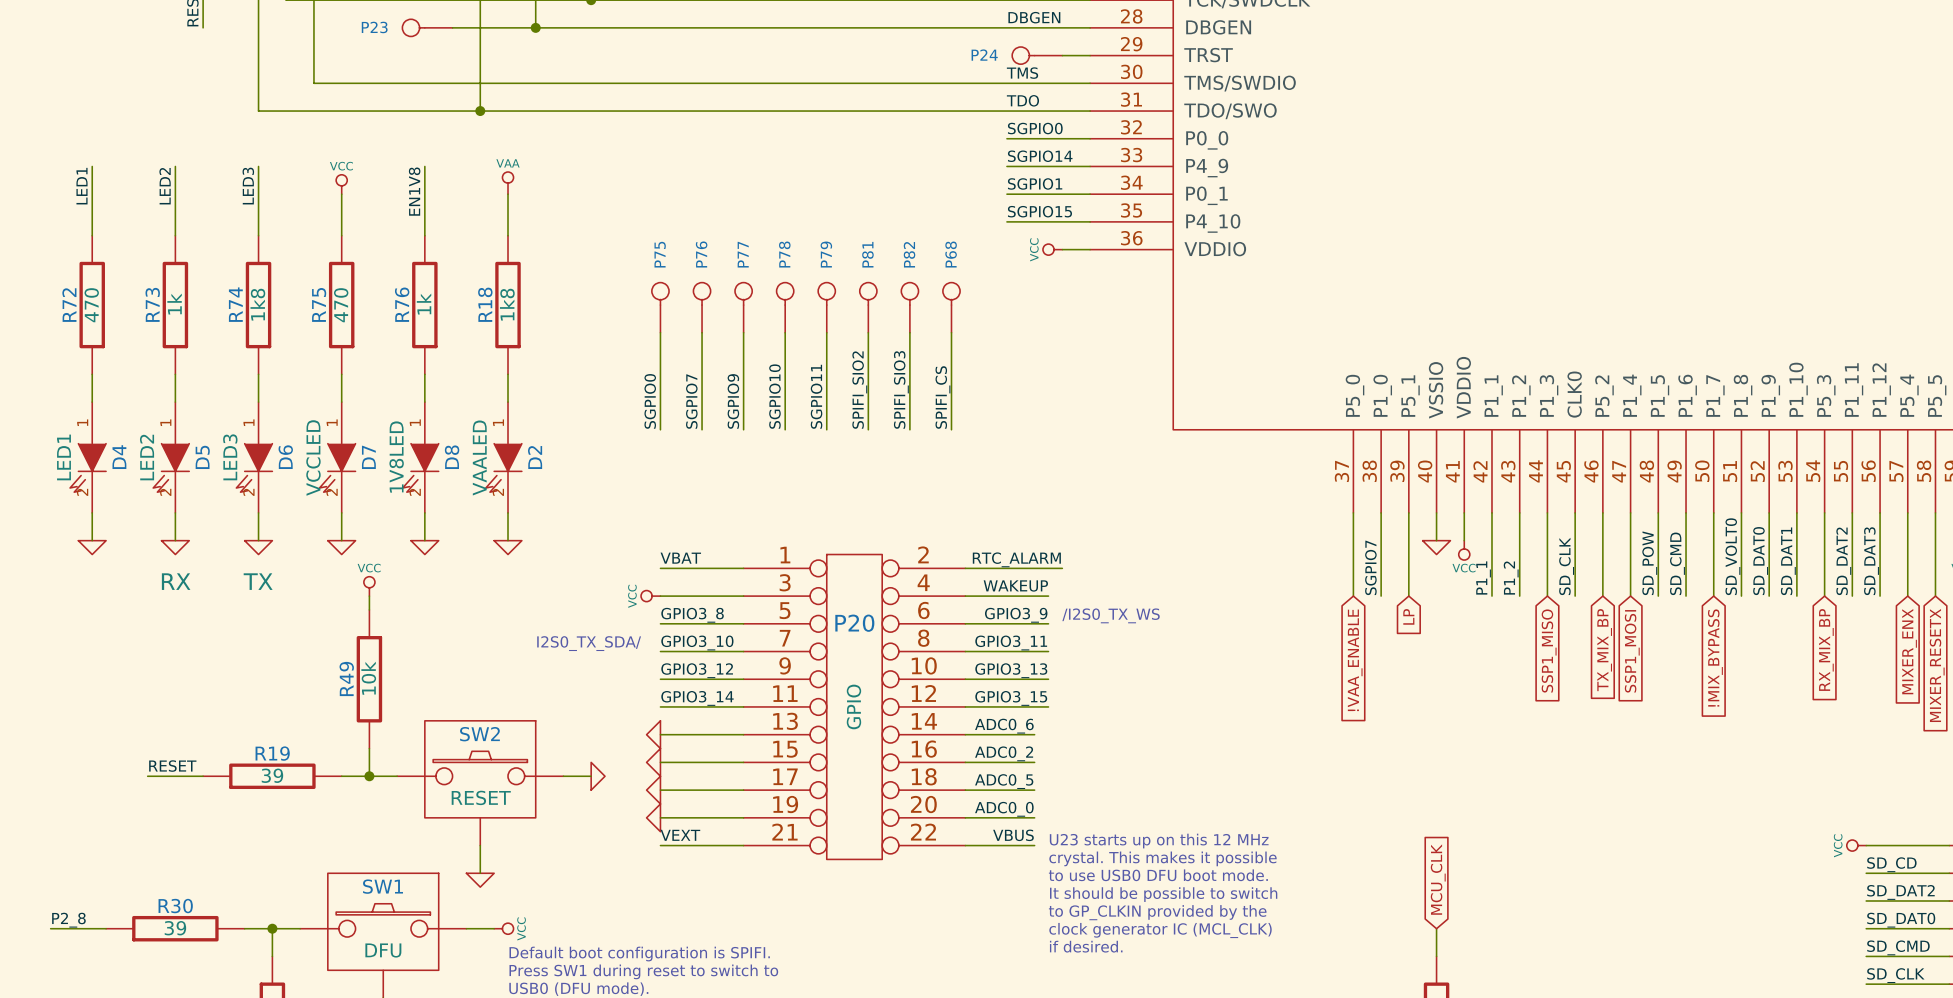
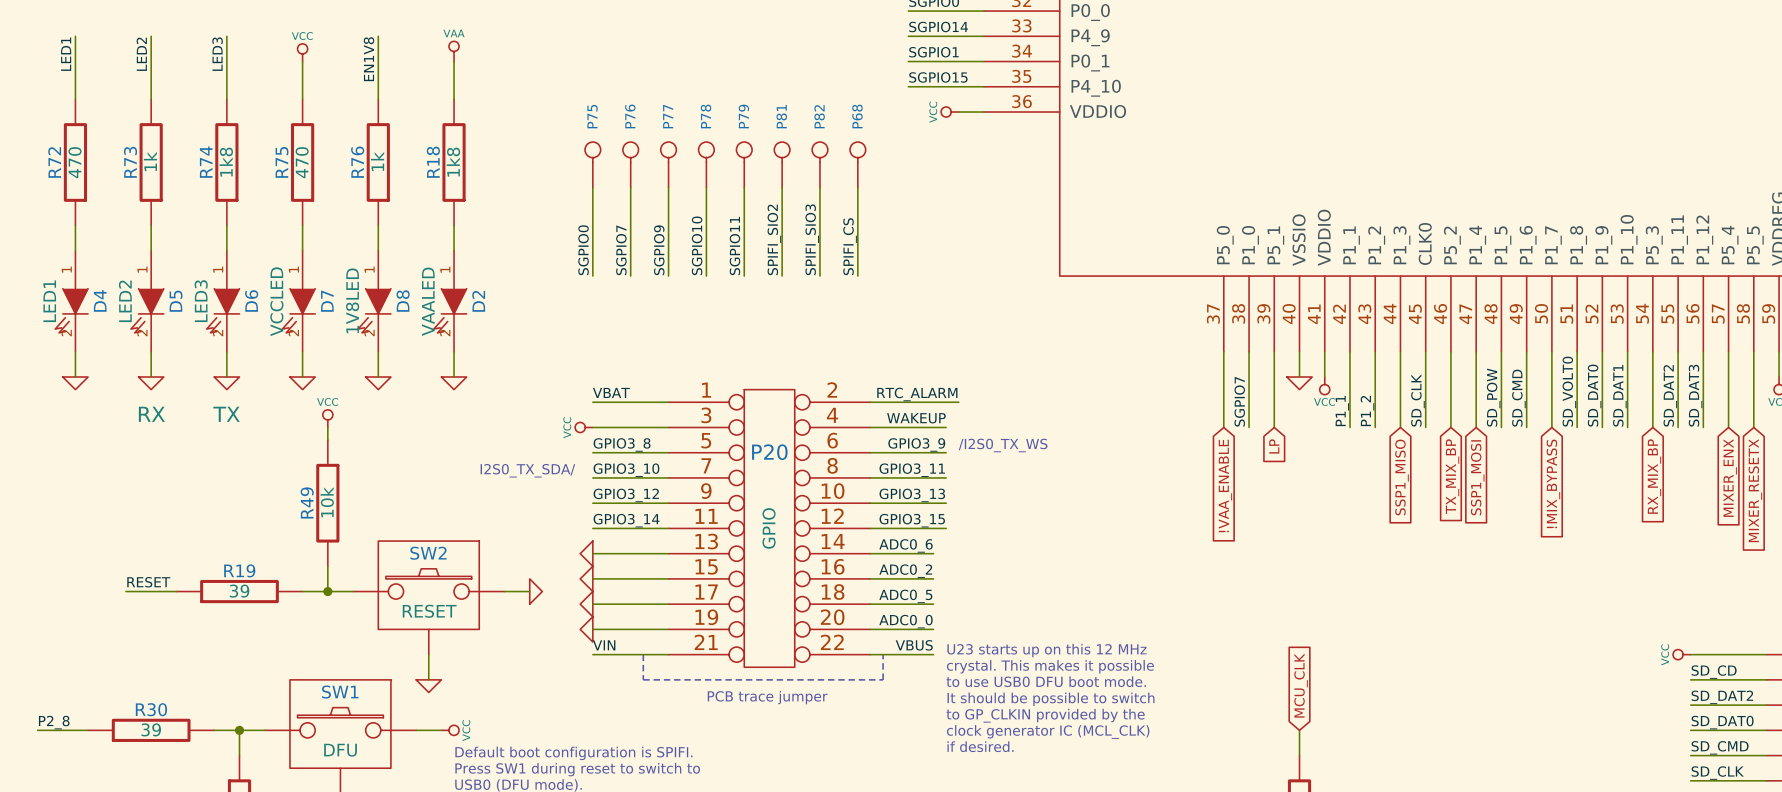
label: VEXT (680, 835) -> VIN (604, 645)
line: none -> (643, 654) (643, 679) (883, 679) (883, 654)
text: none -> PCB trace jumper (767, 697)

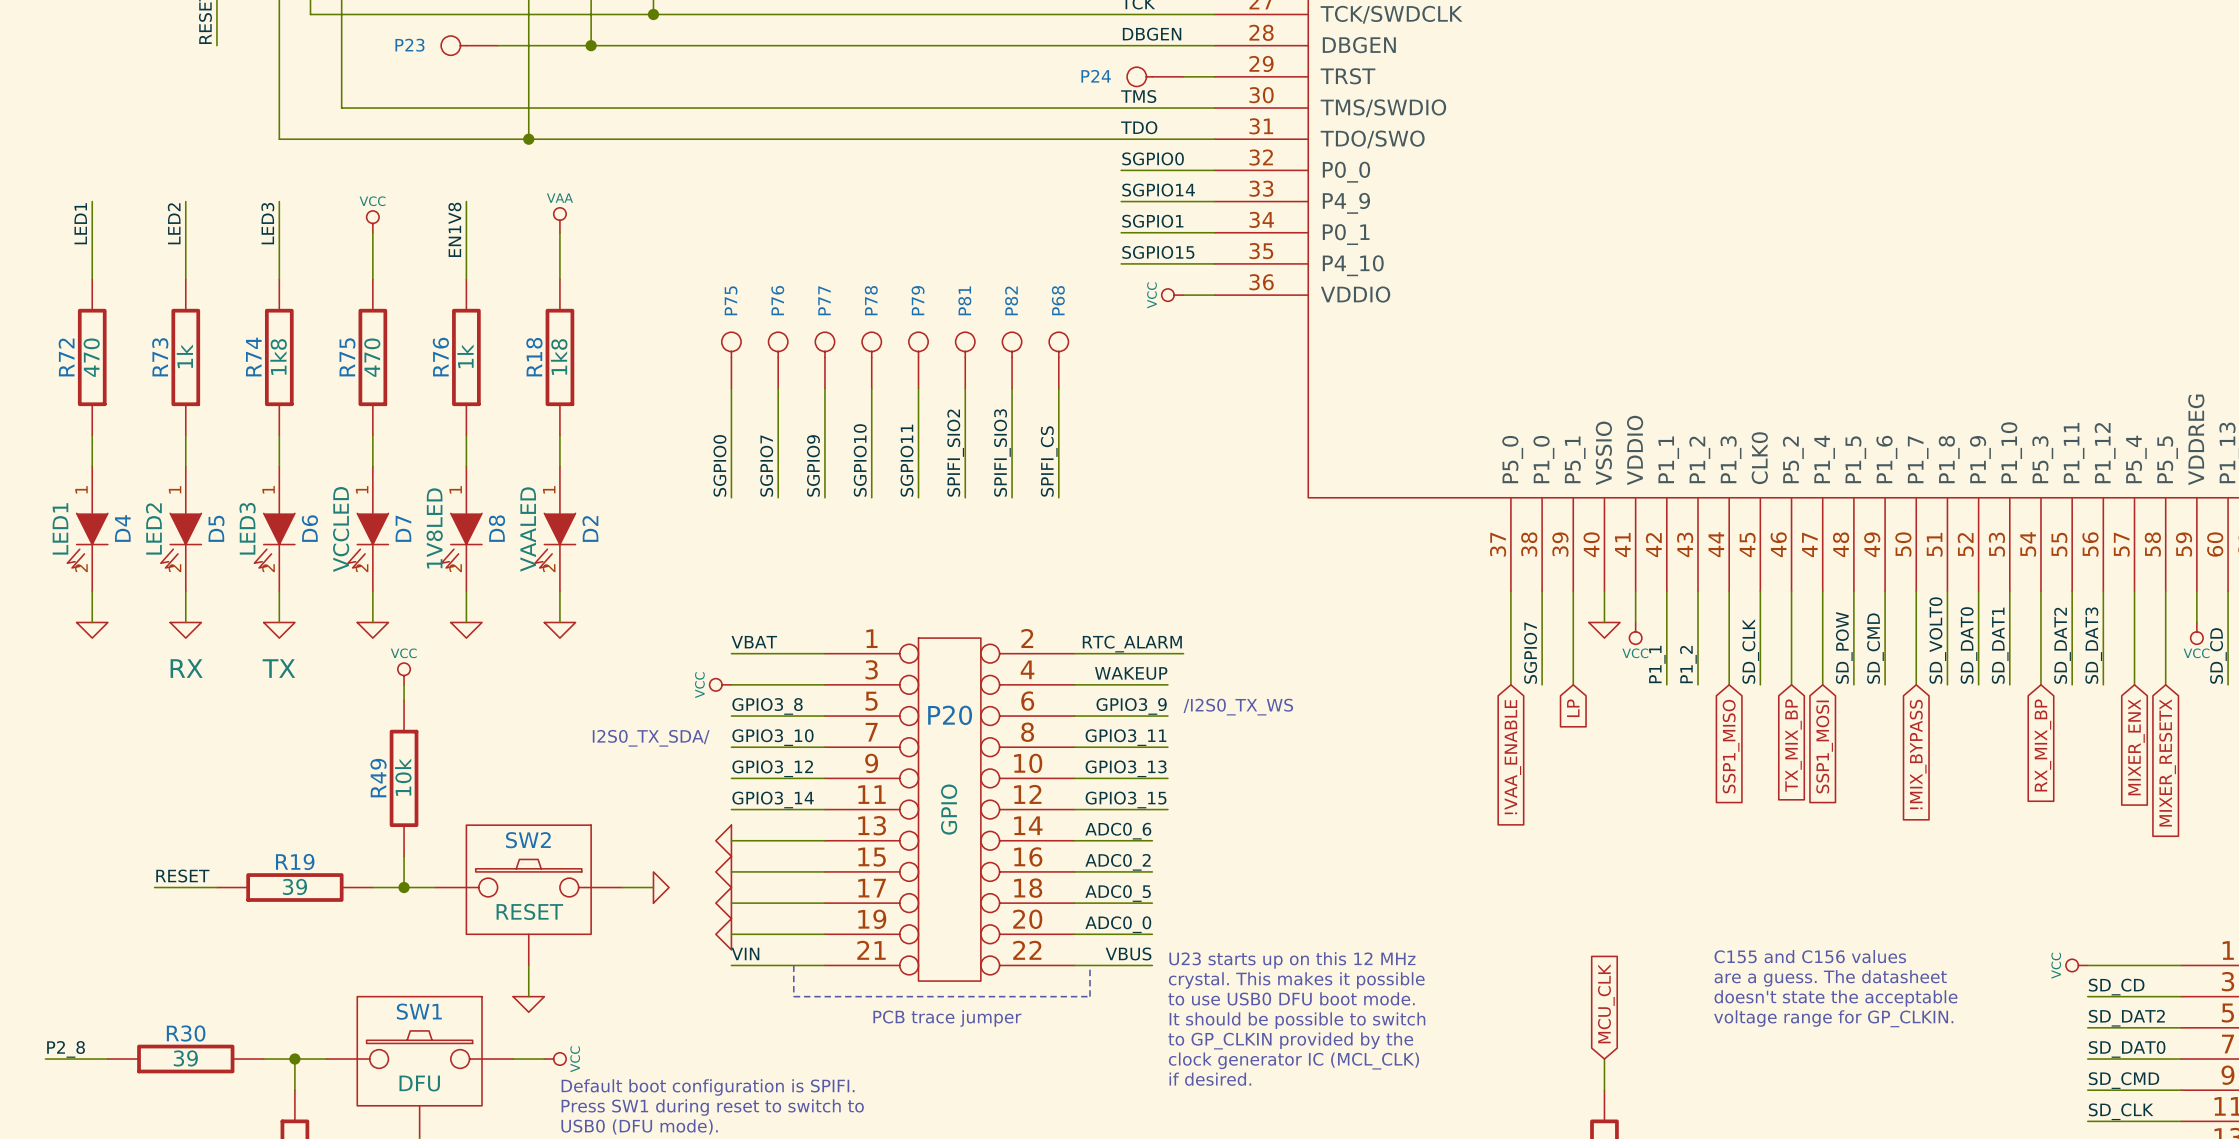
text: none -> C155 and C156 values (1810, 956)
text: none -> are a guess. The datasheet (1830, 978)
text: none -> doesn't state the acceptable (1835, 998)
text: none -> voltage range for GP_CLKIN. (1833, 1018)

